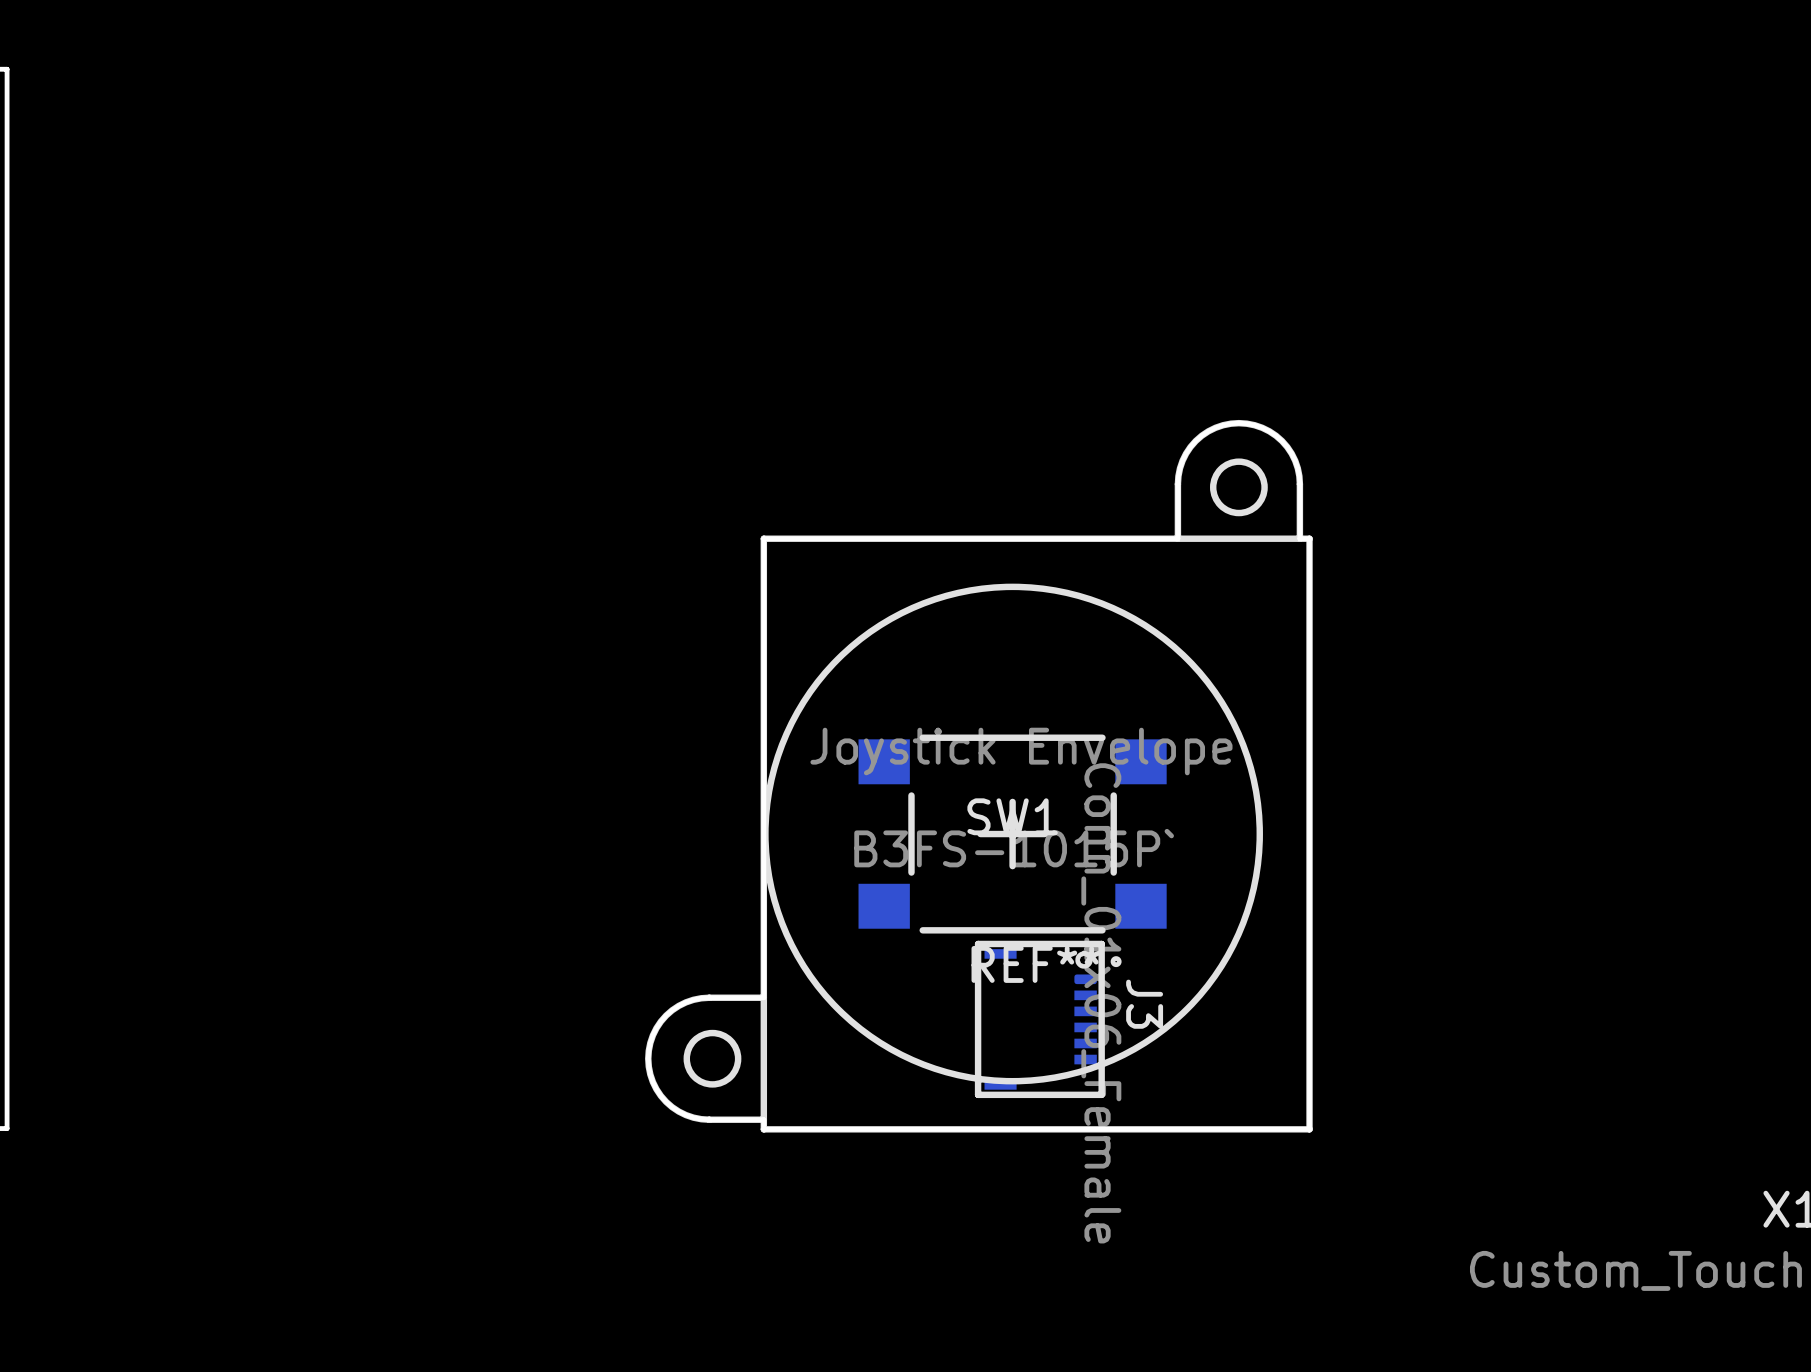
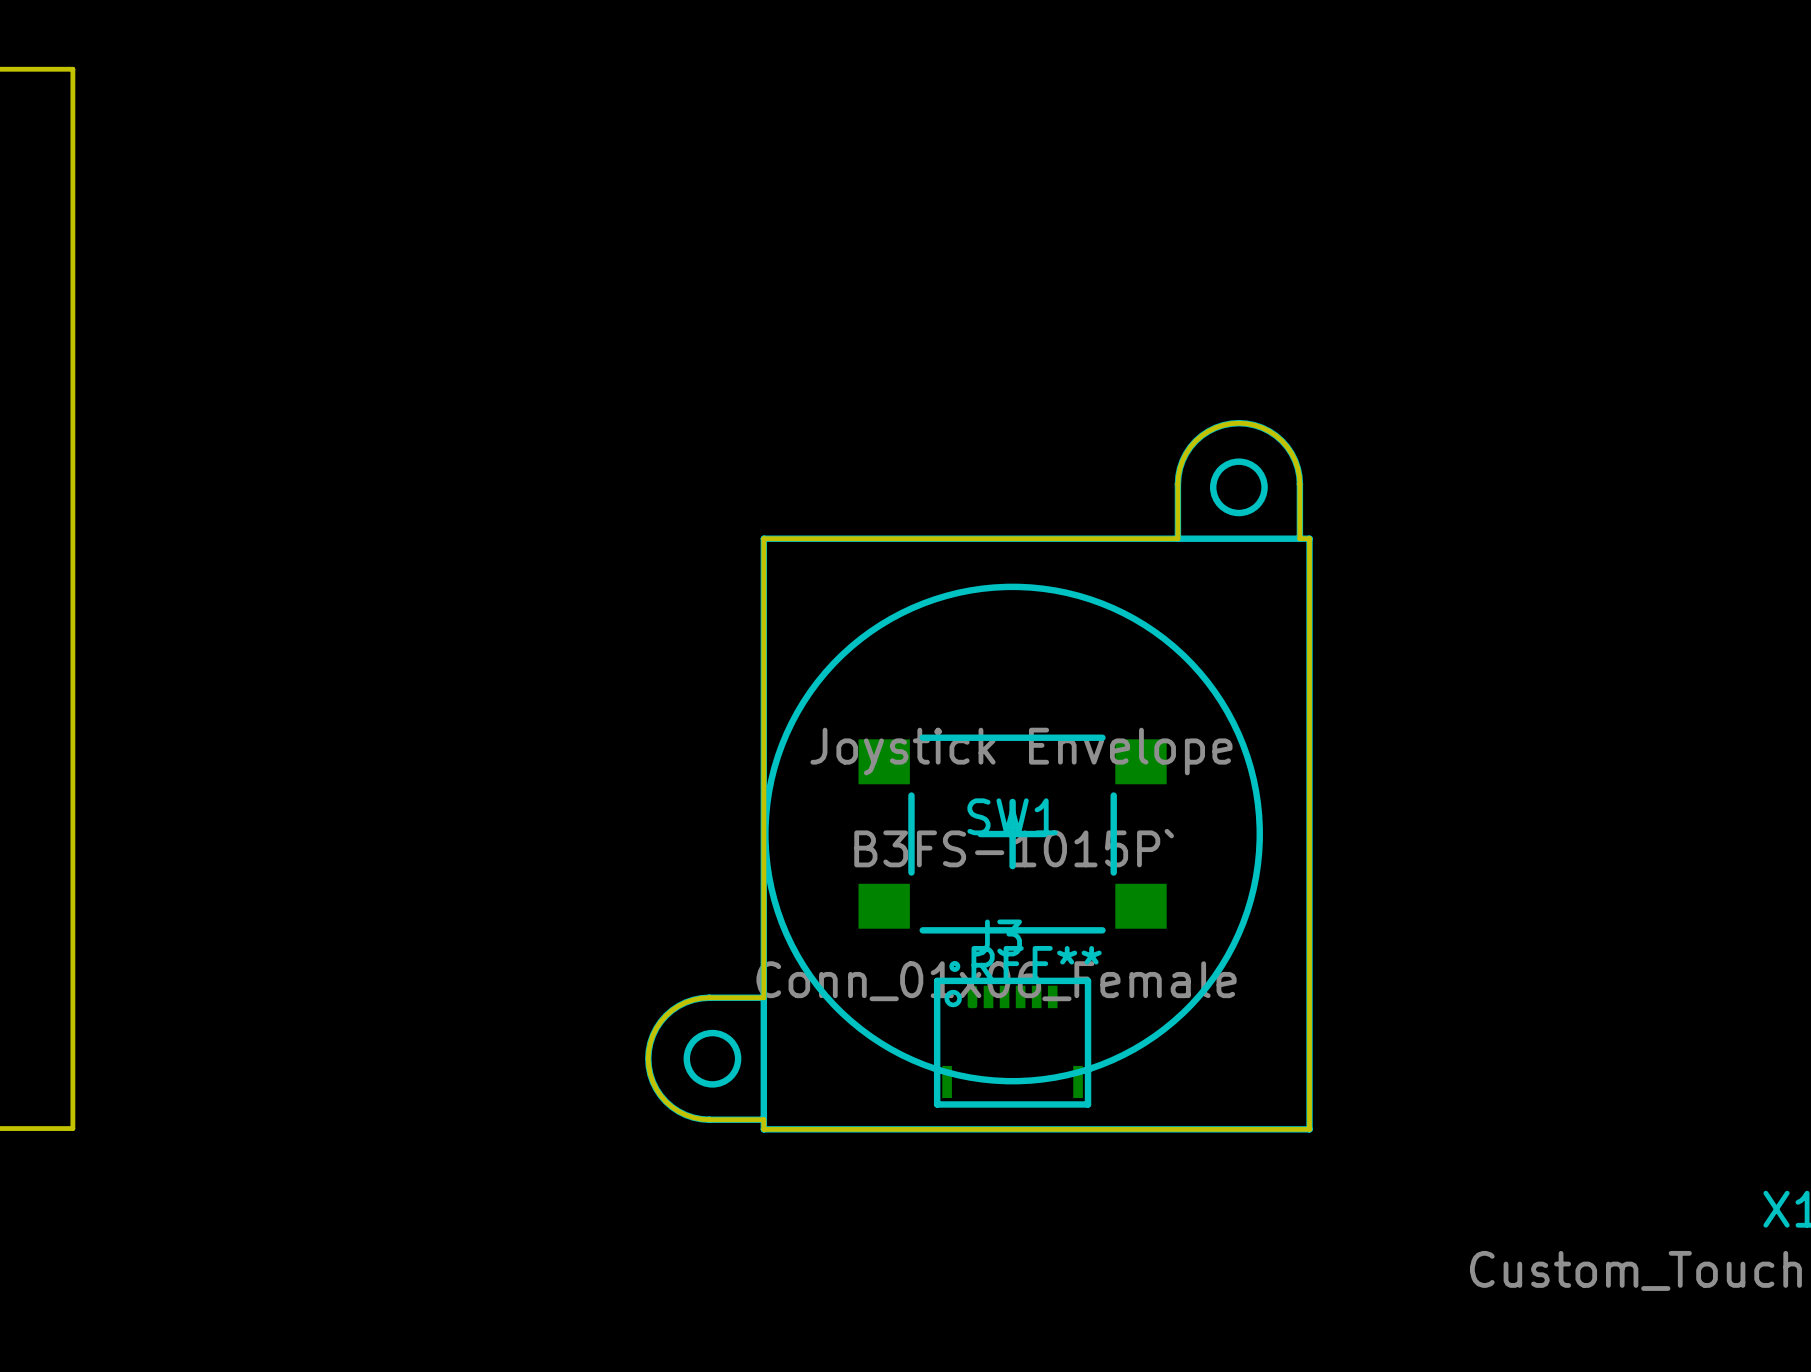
board edge: (7, 69) (7, 1128) -> (7, 69) (72, 69) (72, 1128) (7, 1128)
J3 rotation: 0° (1048, 1019) -> 90° counterclockwise (1012, 1034)

